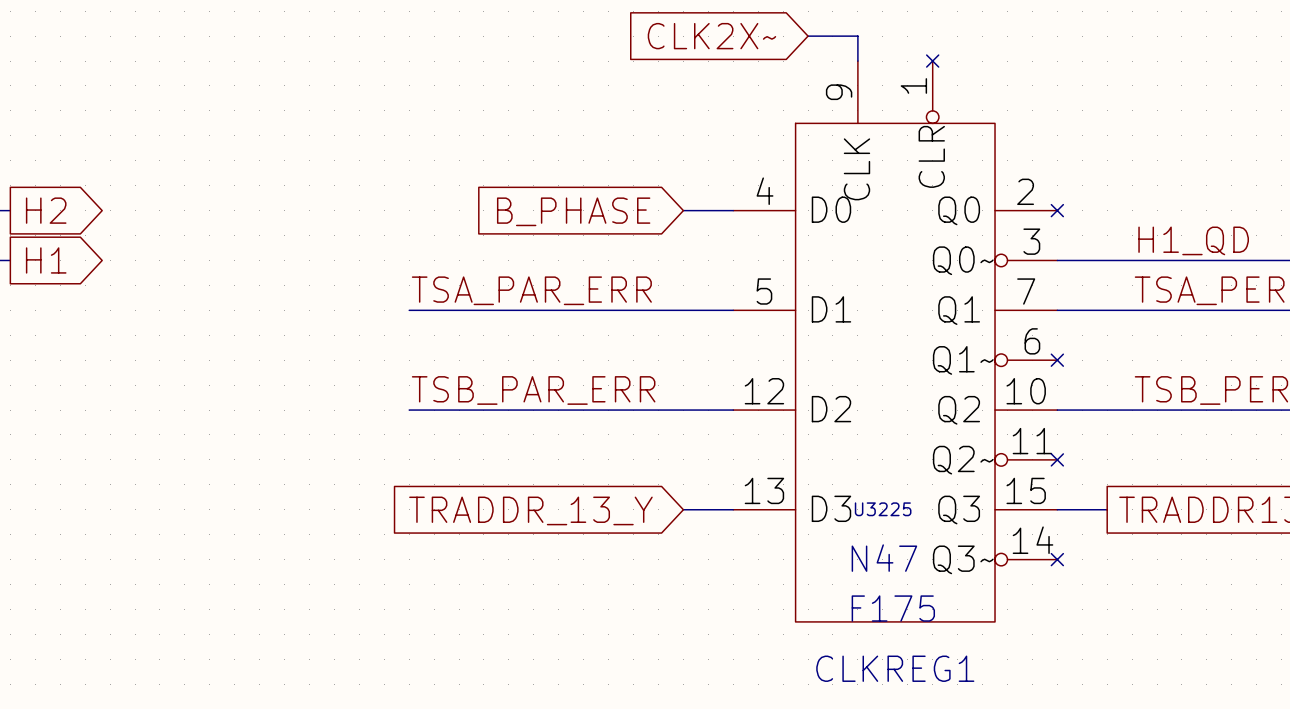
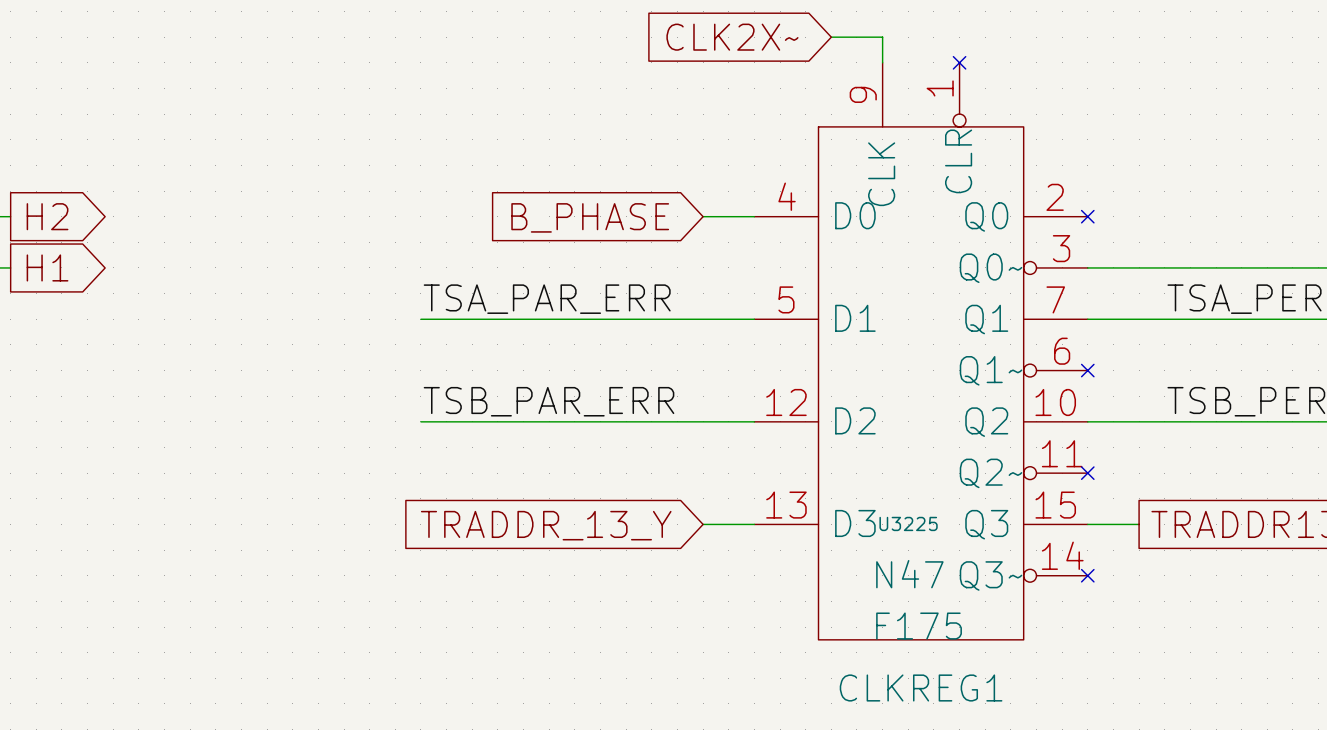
label: H1_QD (1193, 240) -> none

